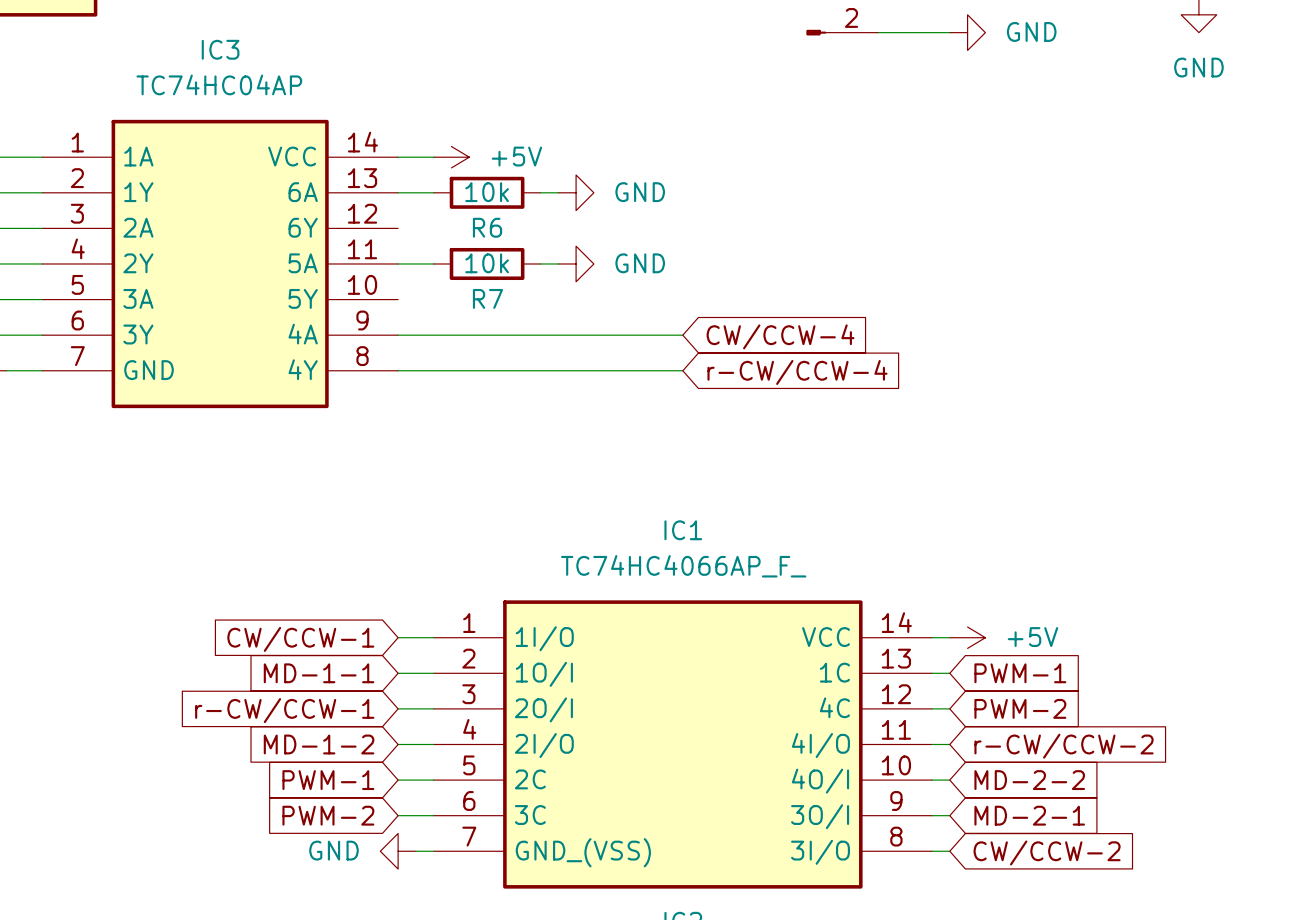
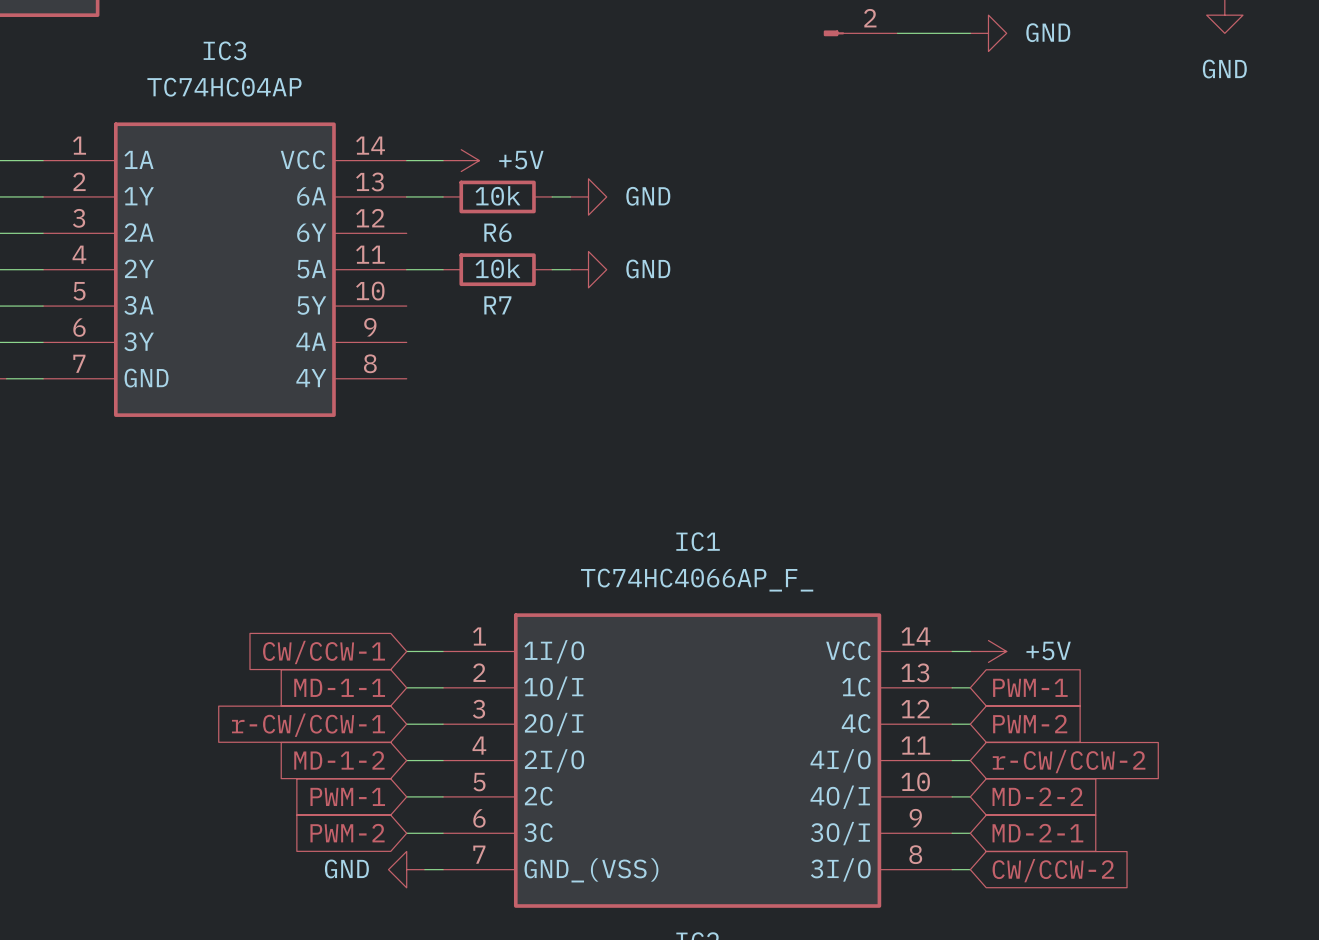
wire: (398, 335) (682, 335) -> none
global label: CW/CCW-4 (780, 336) -> none
wire: (398, 370) (682, 370) -> none
global label: r-CW/CCW-4 (797, 372) -> none

